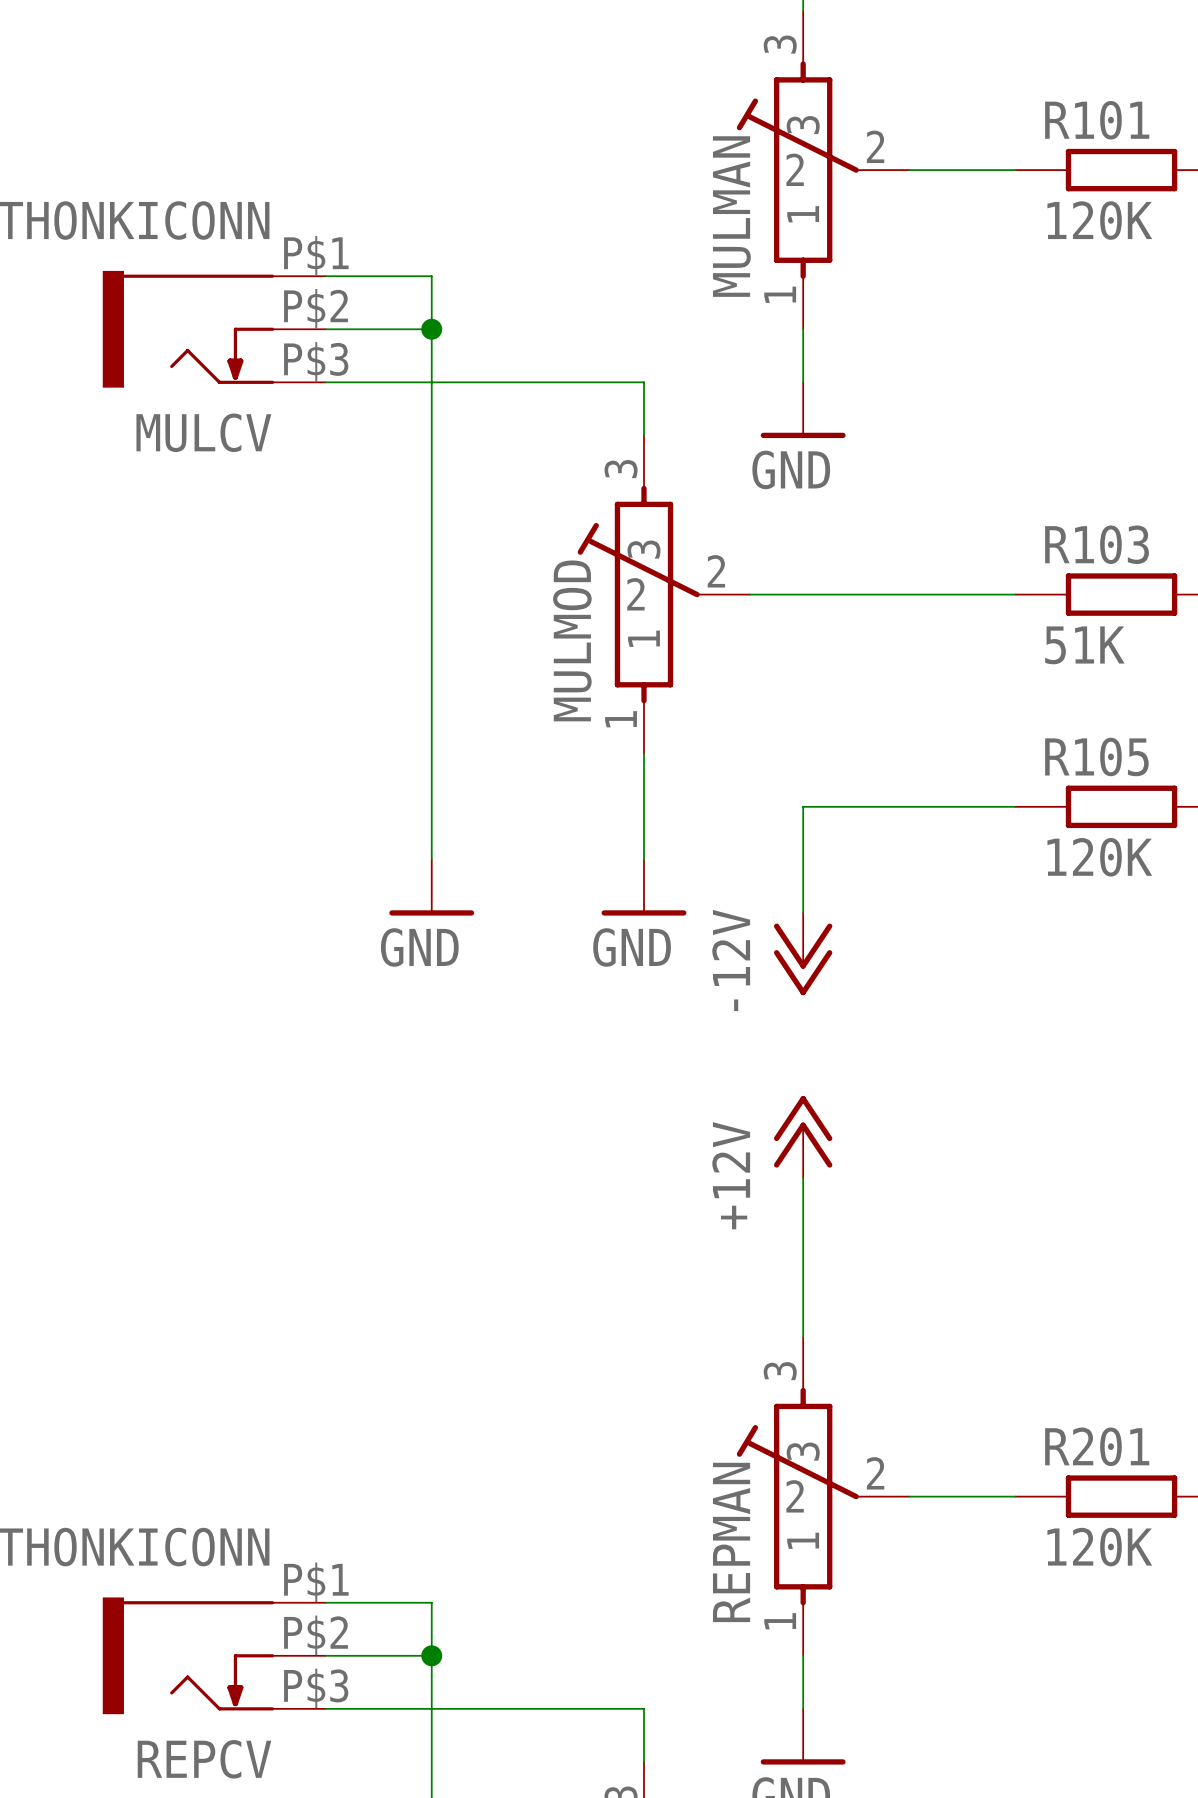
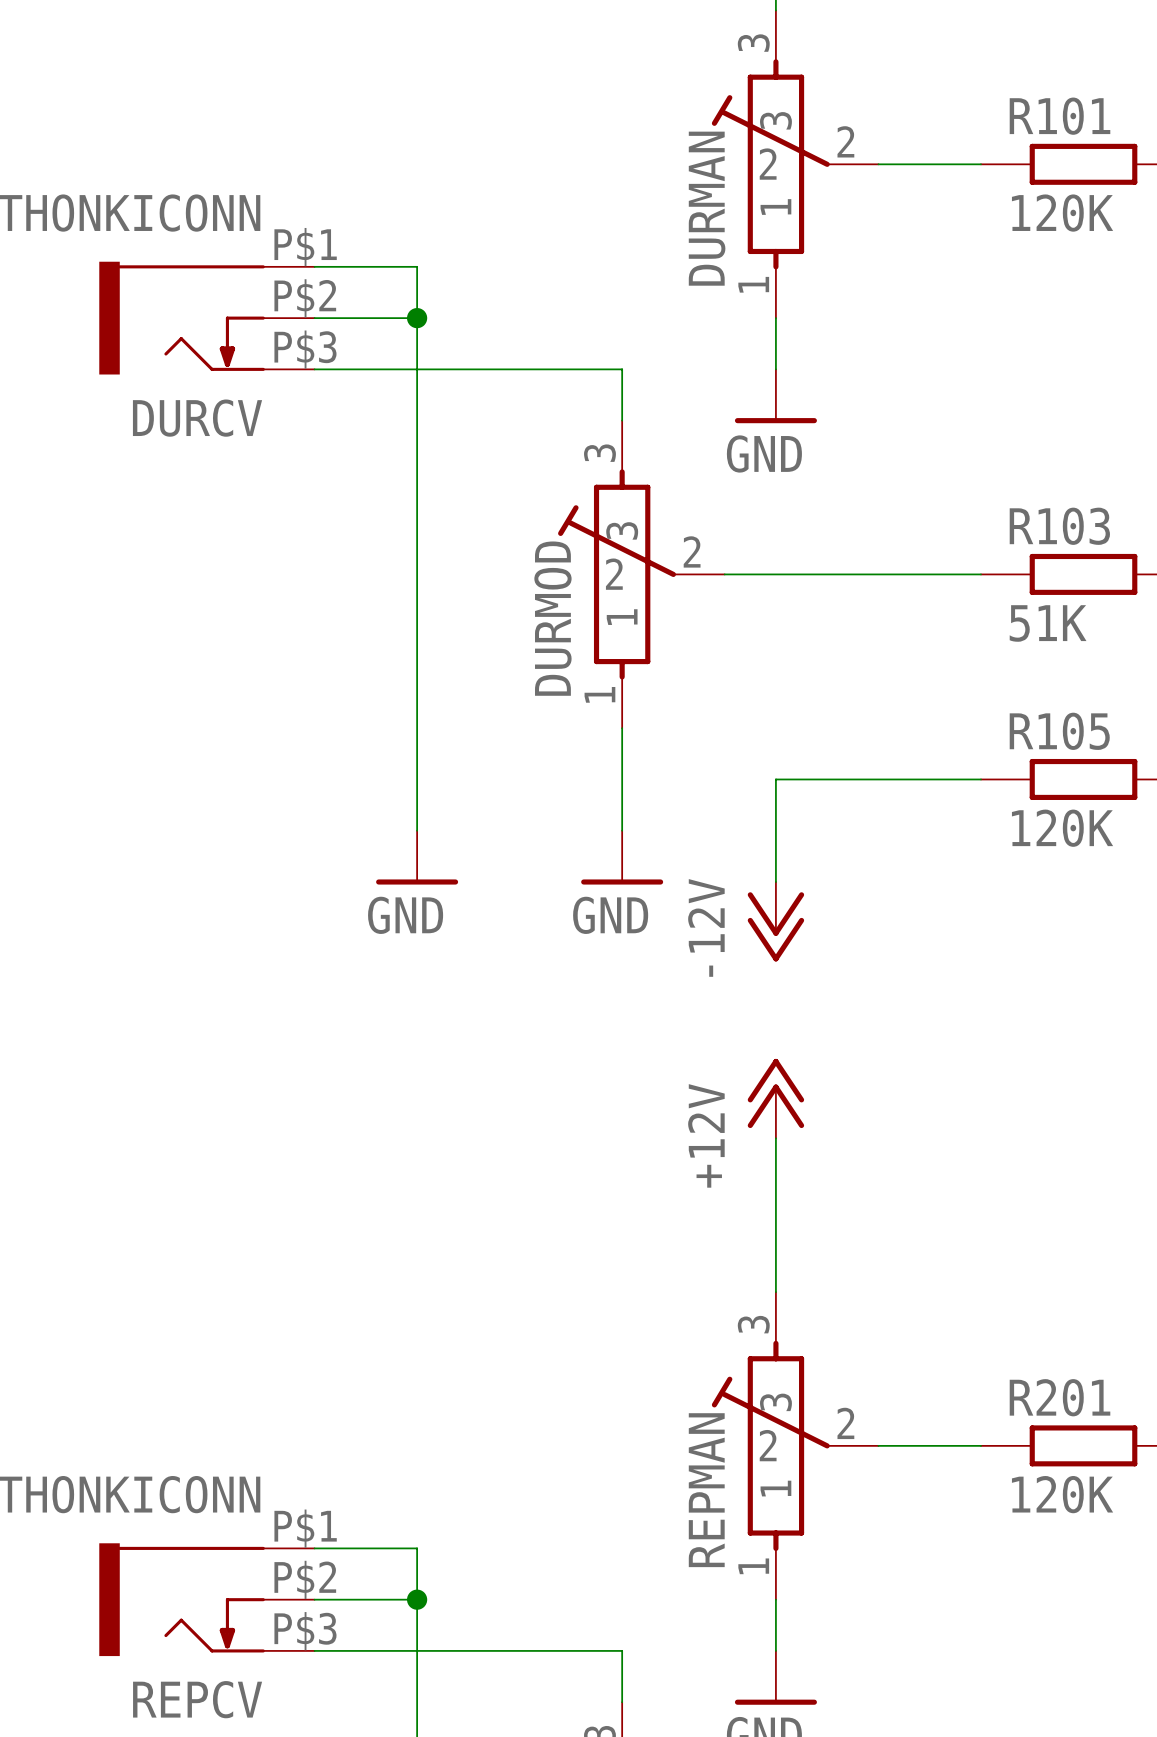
MULMAN name: MULMAN (731, 216) -> DURMAN (707, 208)
MULCV name: MULCV (203, 432) -> DURCV (197, 418)
MULMOD name: MULMOD (572, 640) -> DURMOD (552, 618)

